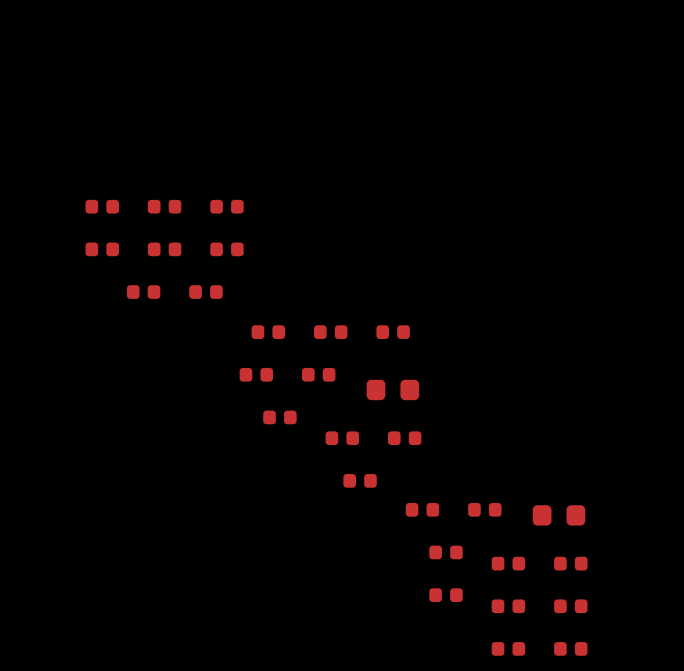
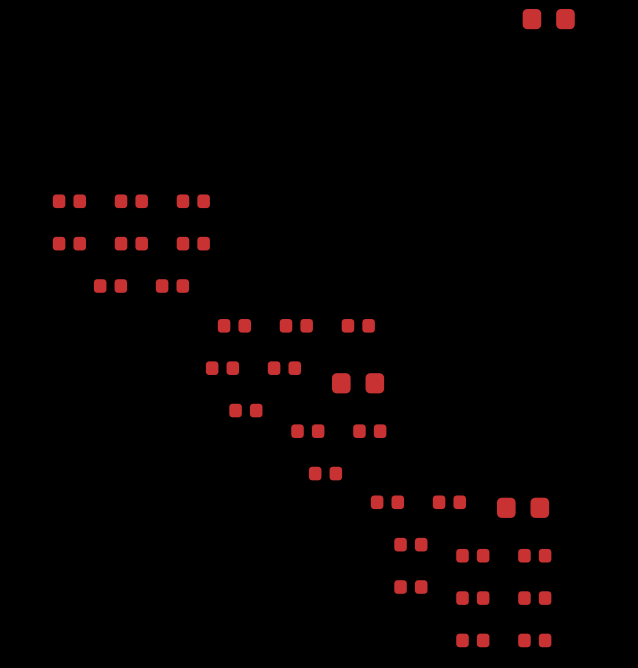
part: none -> (548, 19)

